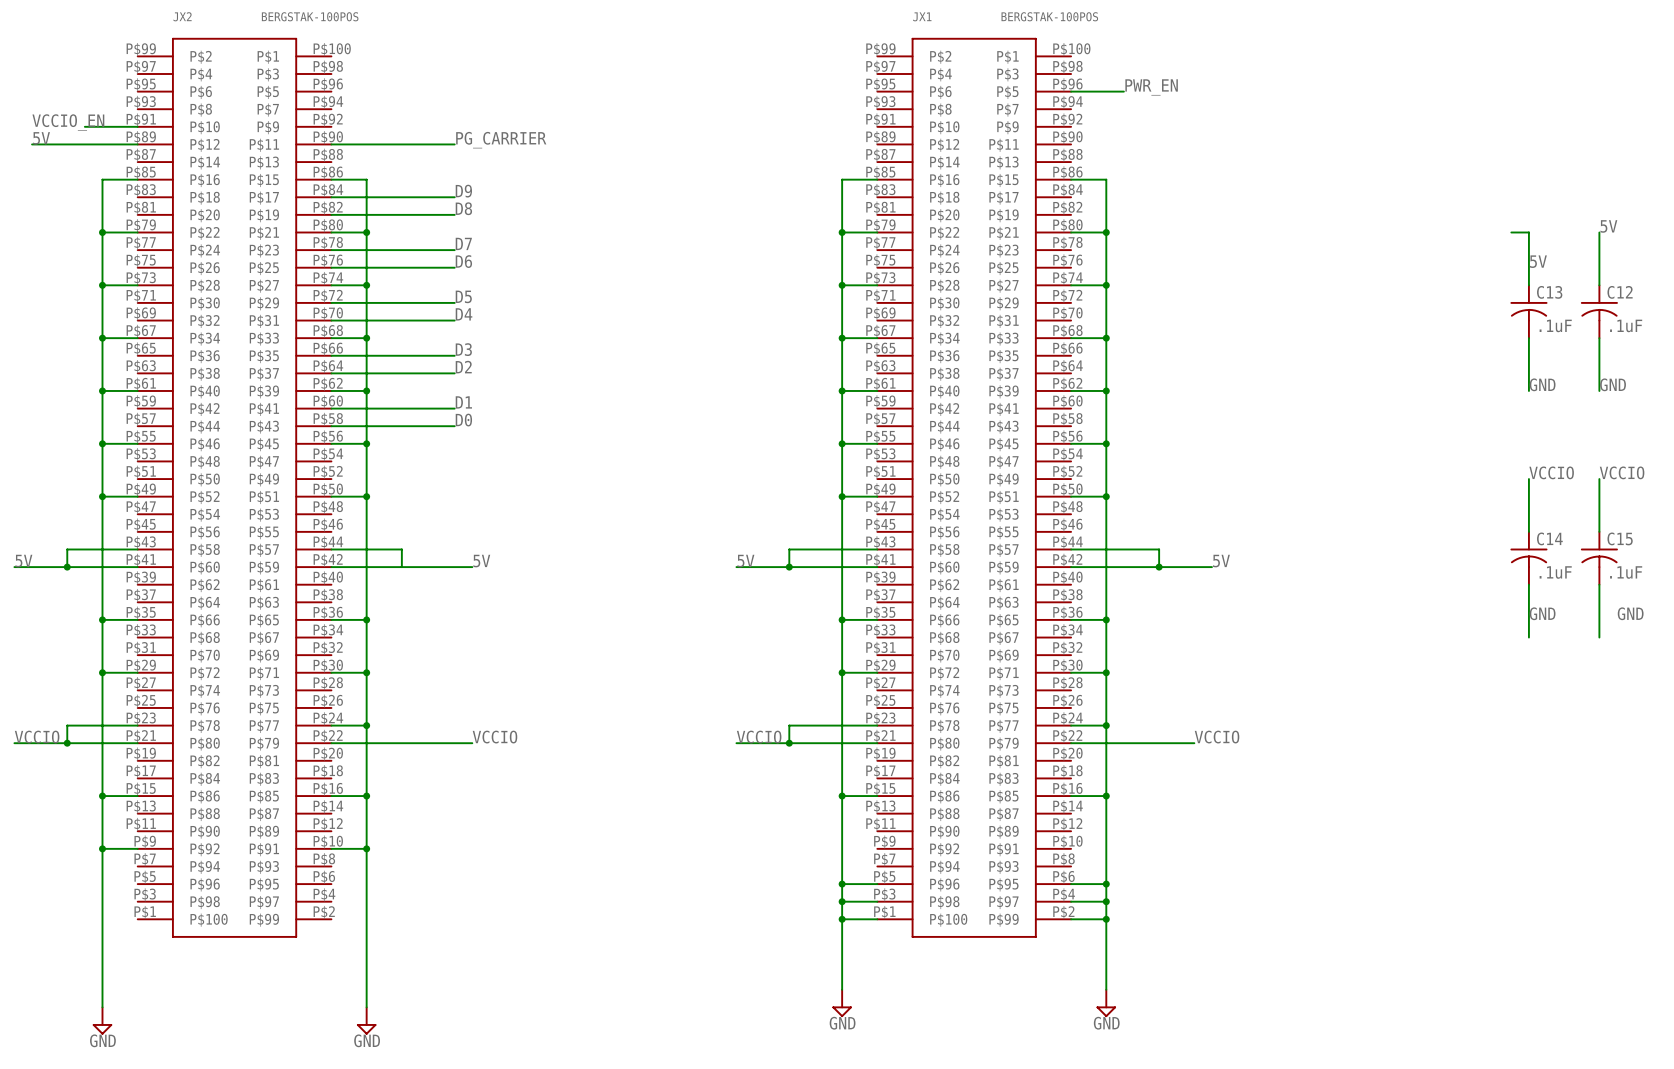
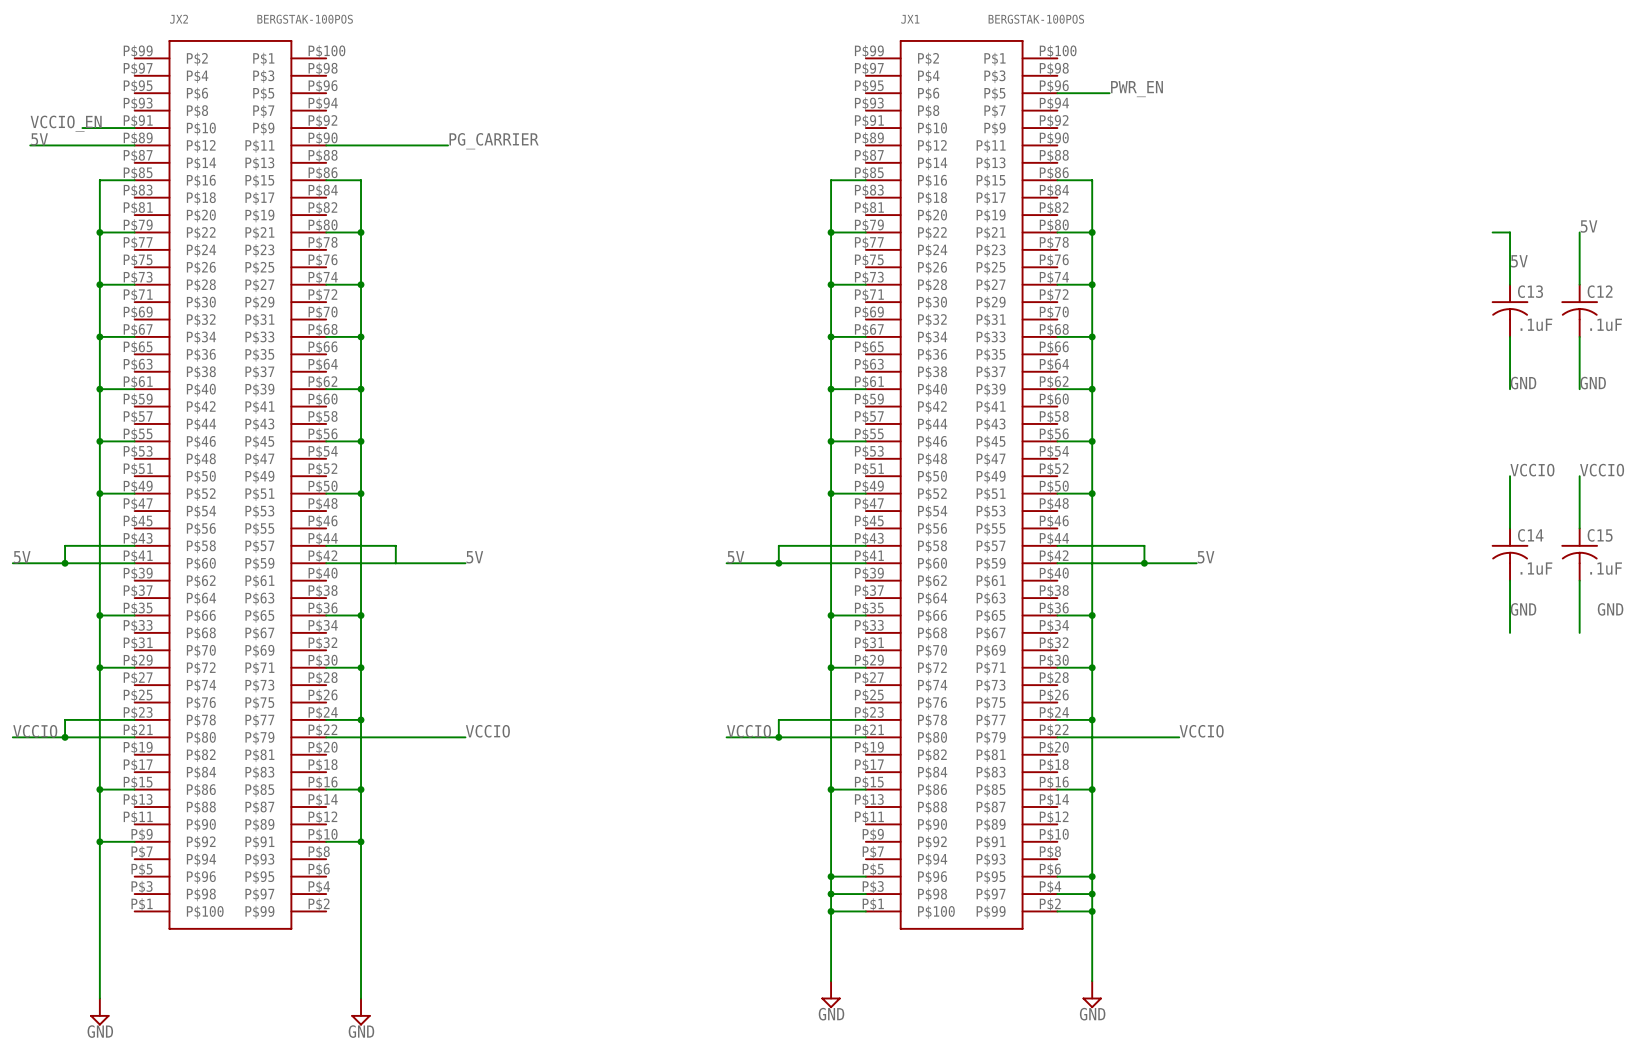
label: D9 (463, 191) -> none
wire: (331, 197) (454, 197) -> none
label: D8 (463, 208) -> none
wire: (331, 214) (454, 214) -> none
label: D7 (463, 243) -> none
wire: (331, 250) (454, 250) -> none
label: D6 (463, 261) -> none
wire: (331, 267) (454, 267) -> none
label: D5 (463, 296) -> none
wire: (331, 302) (454, 302) -> none
label: D4 (464, 314) -> none
wire: (331, 320) (454, 320) -> none
label: D3 (463, 349) -> none
wire: (331, 355) (454, 355) -> none
label: D2 (463, 367) -> none
wire: (331, 373) (454, 373) -> none
label: D1 (463, 402) -> none
wire: (331, 408) (454, 408) -> none
label: D0 (463, 420) -> none
wire: (331, 426) (454, 426) -> none

